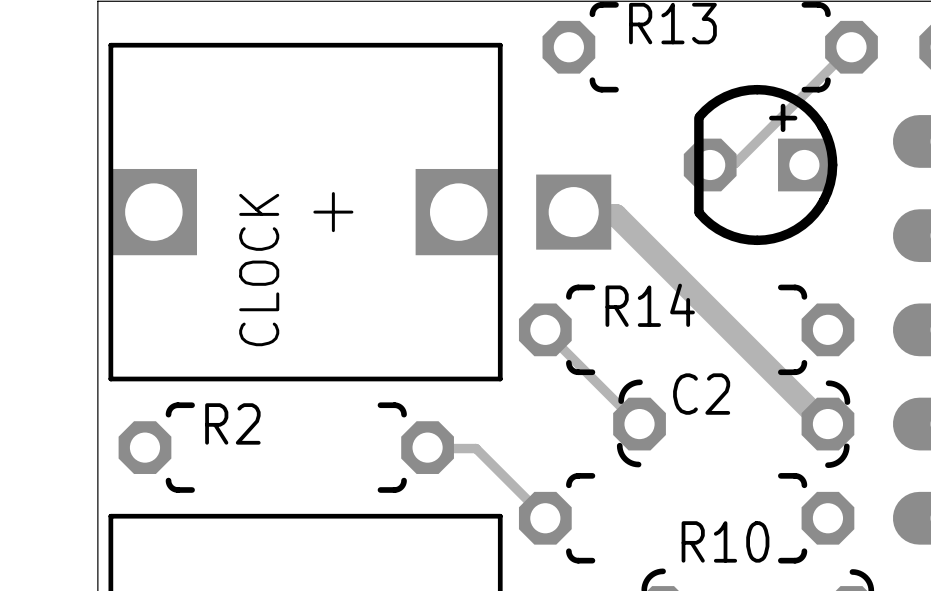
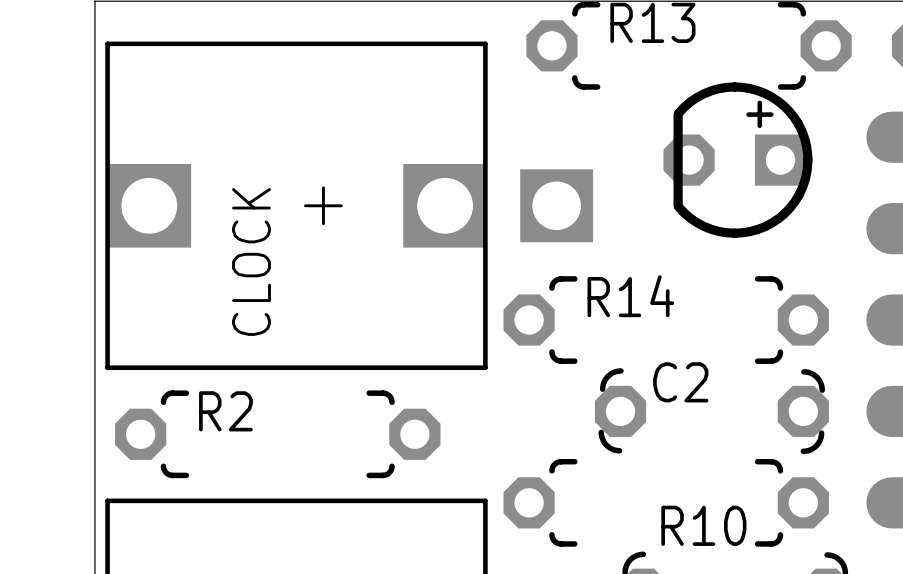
track: (851, 47) (735, 163) (710, 165) -> none
track: (573, 212) (574, 215) (615, 215) (823, 422) (827, 424) -> none
track: (545, 329) (639, 424) -> none
track: (427, 447) (476, 448) (545, 518) -> none

